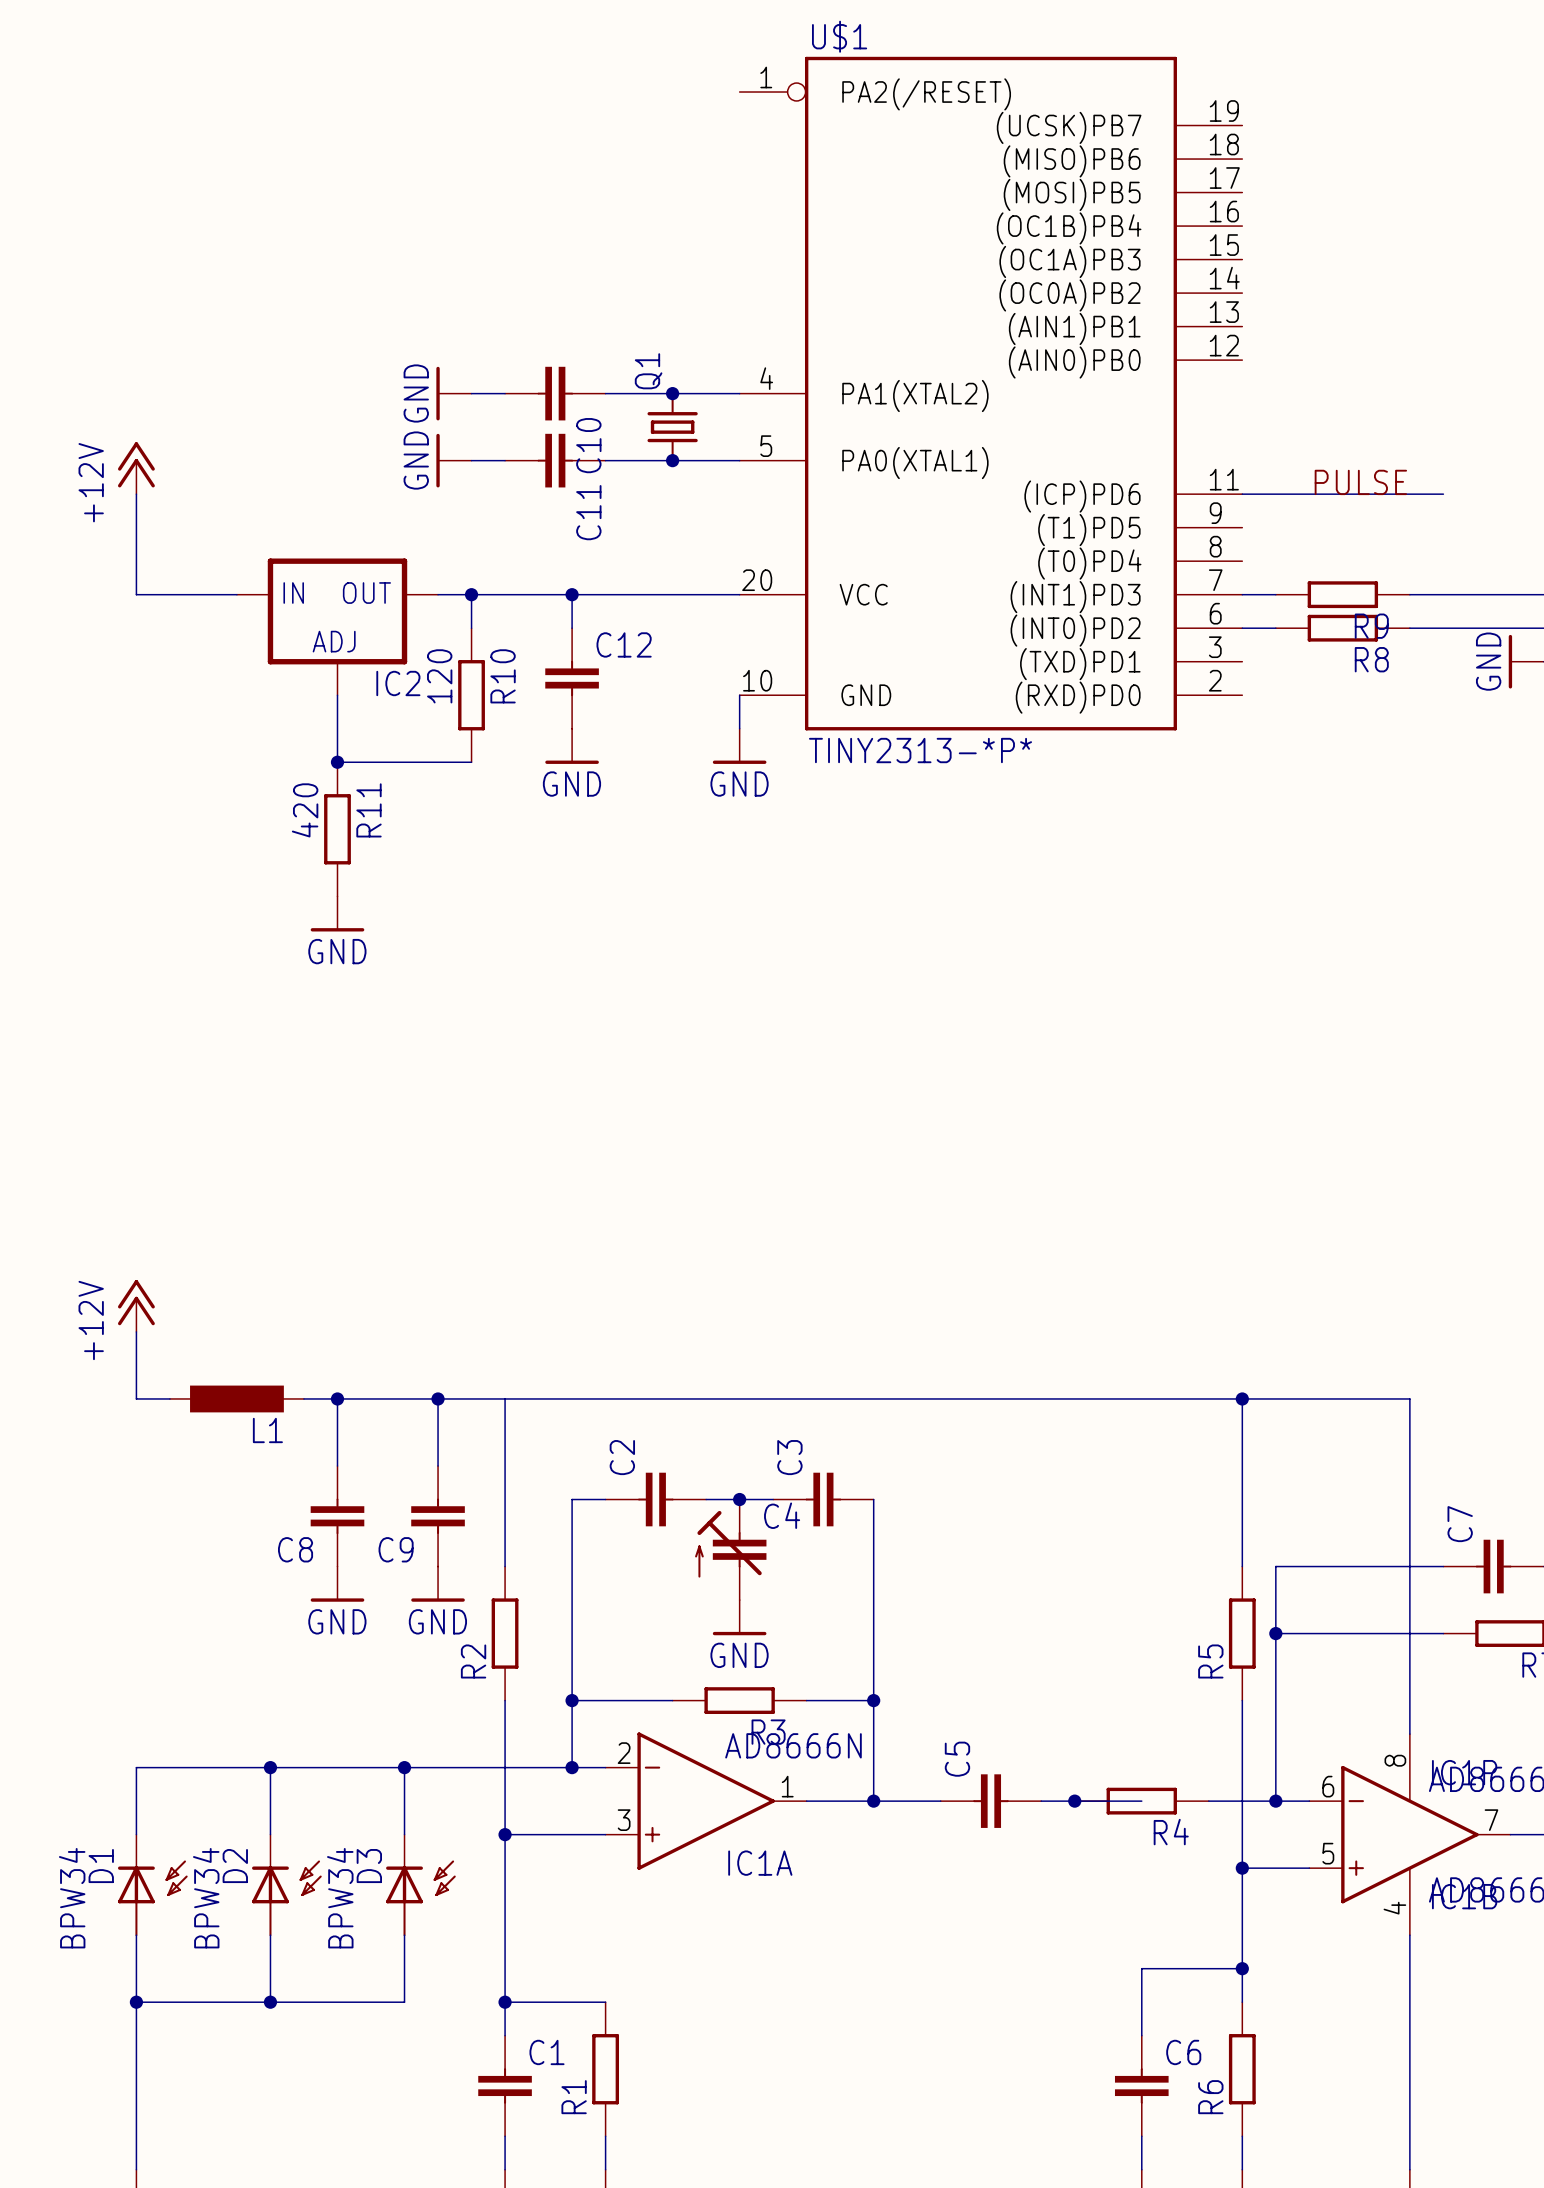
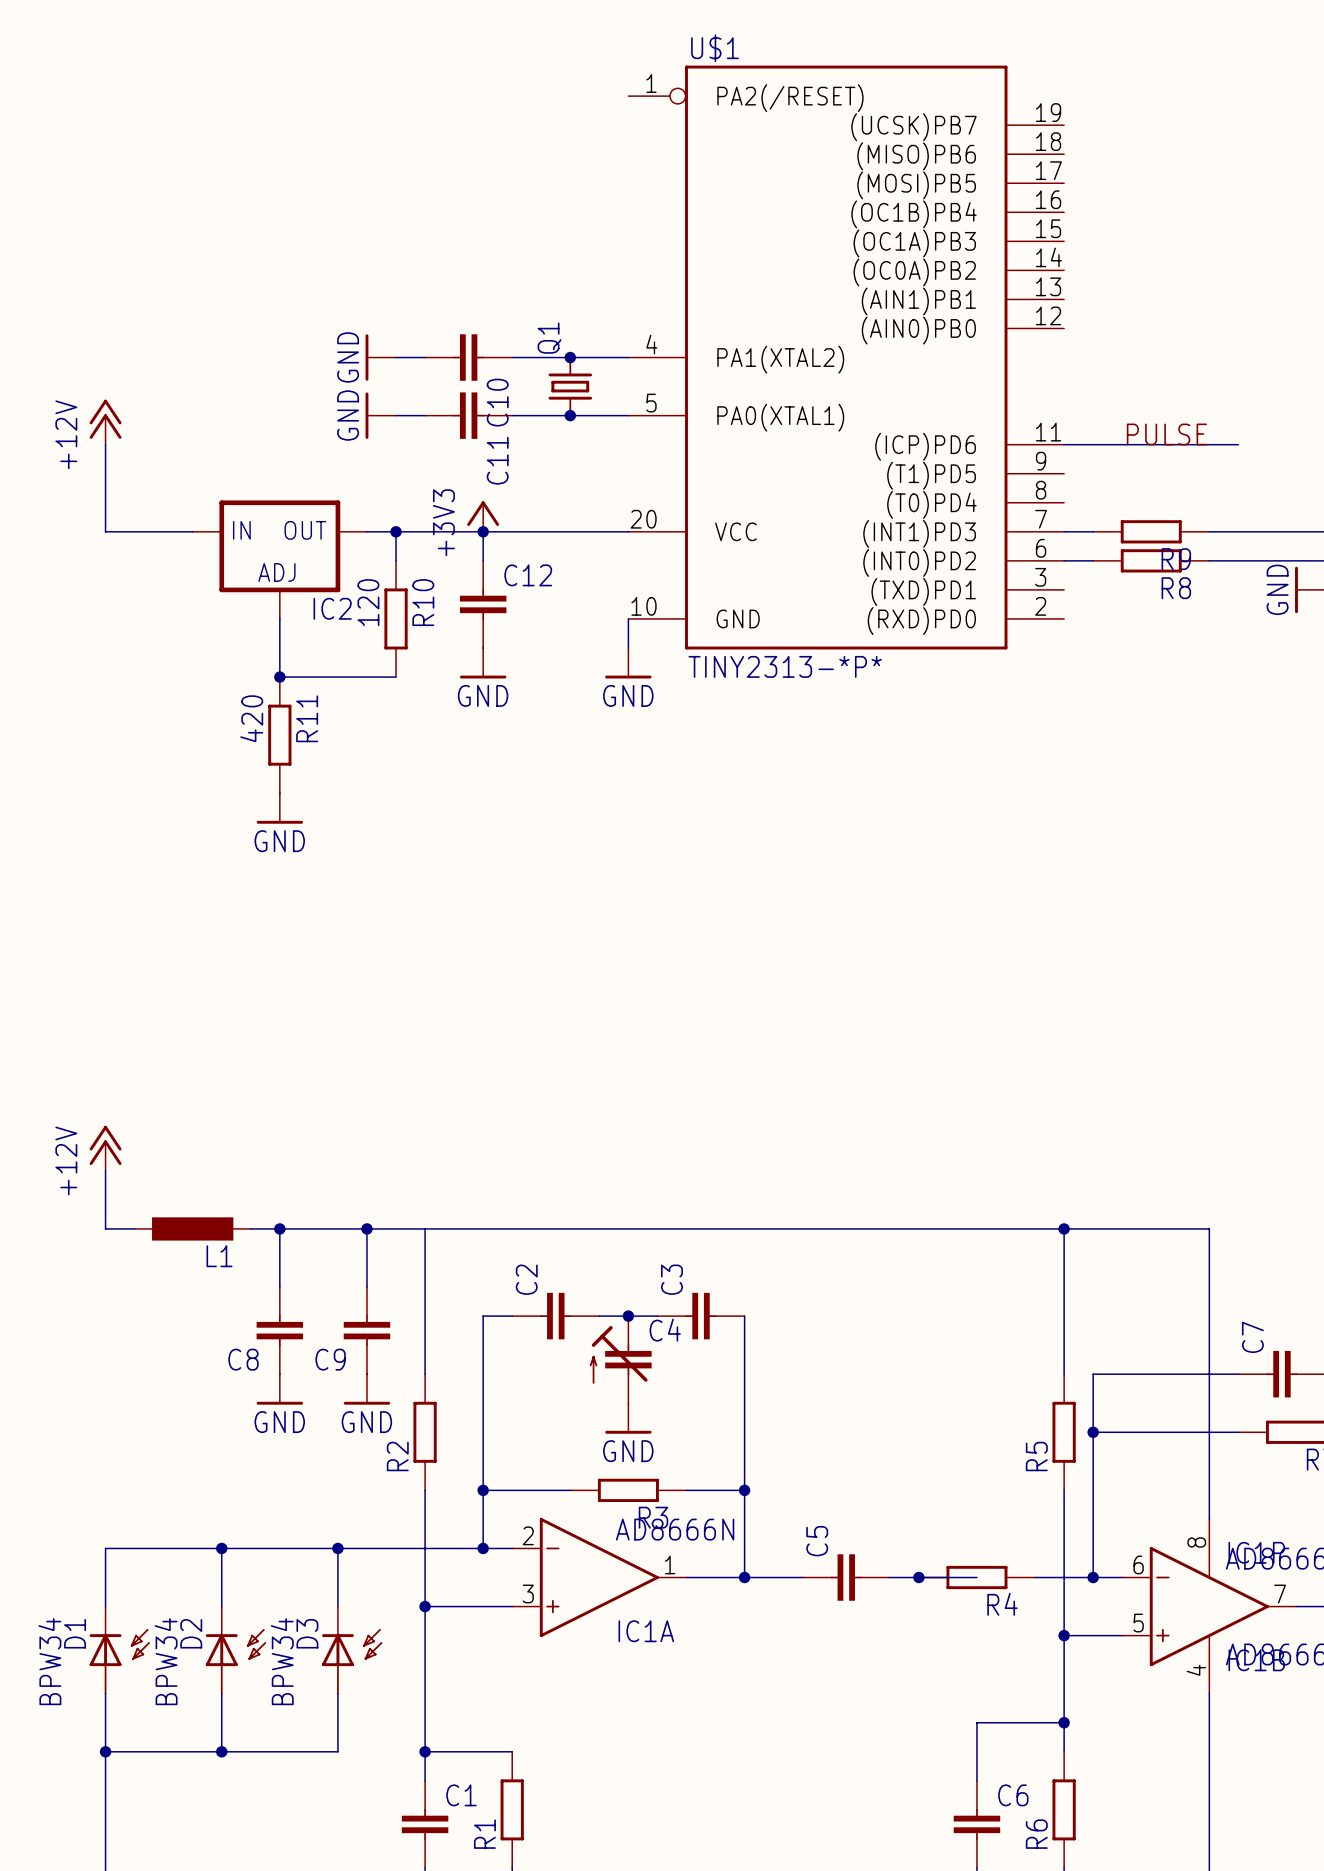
power symbol: none -> +3V3 (483, 516)

